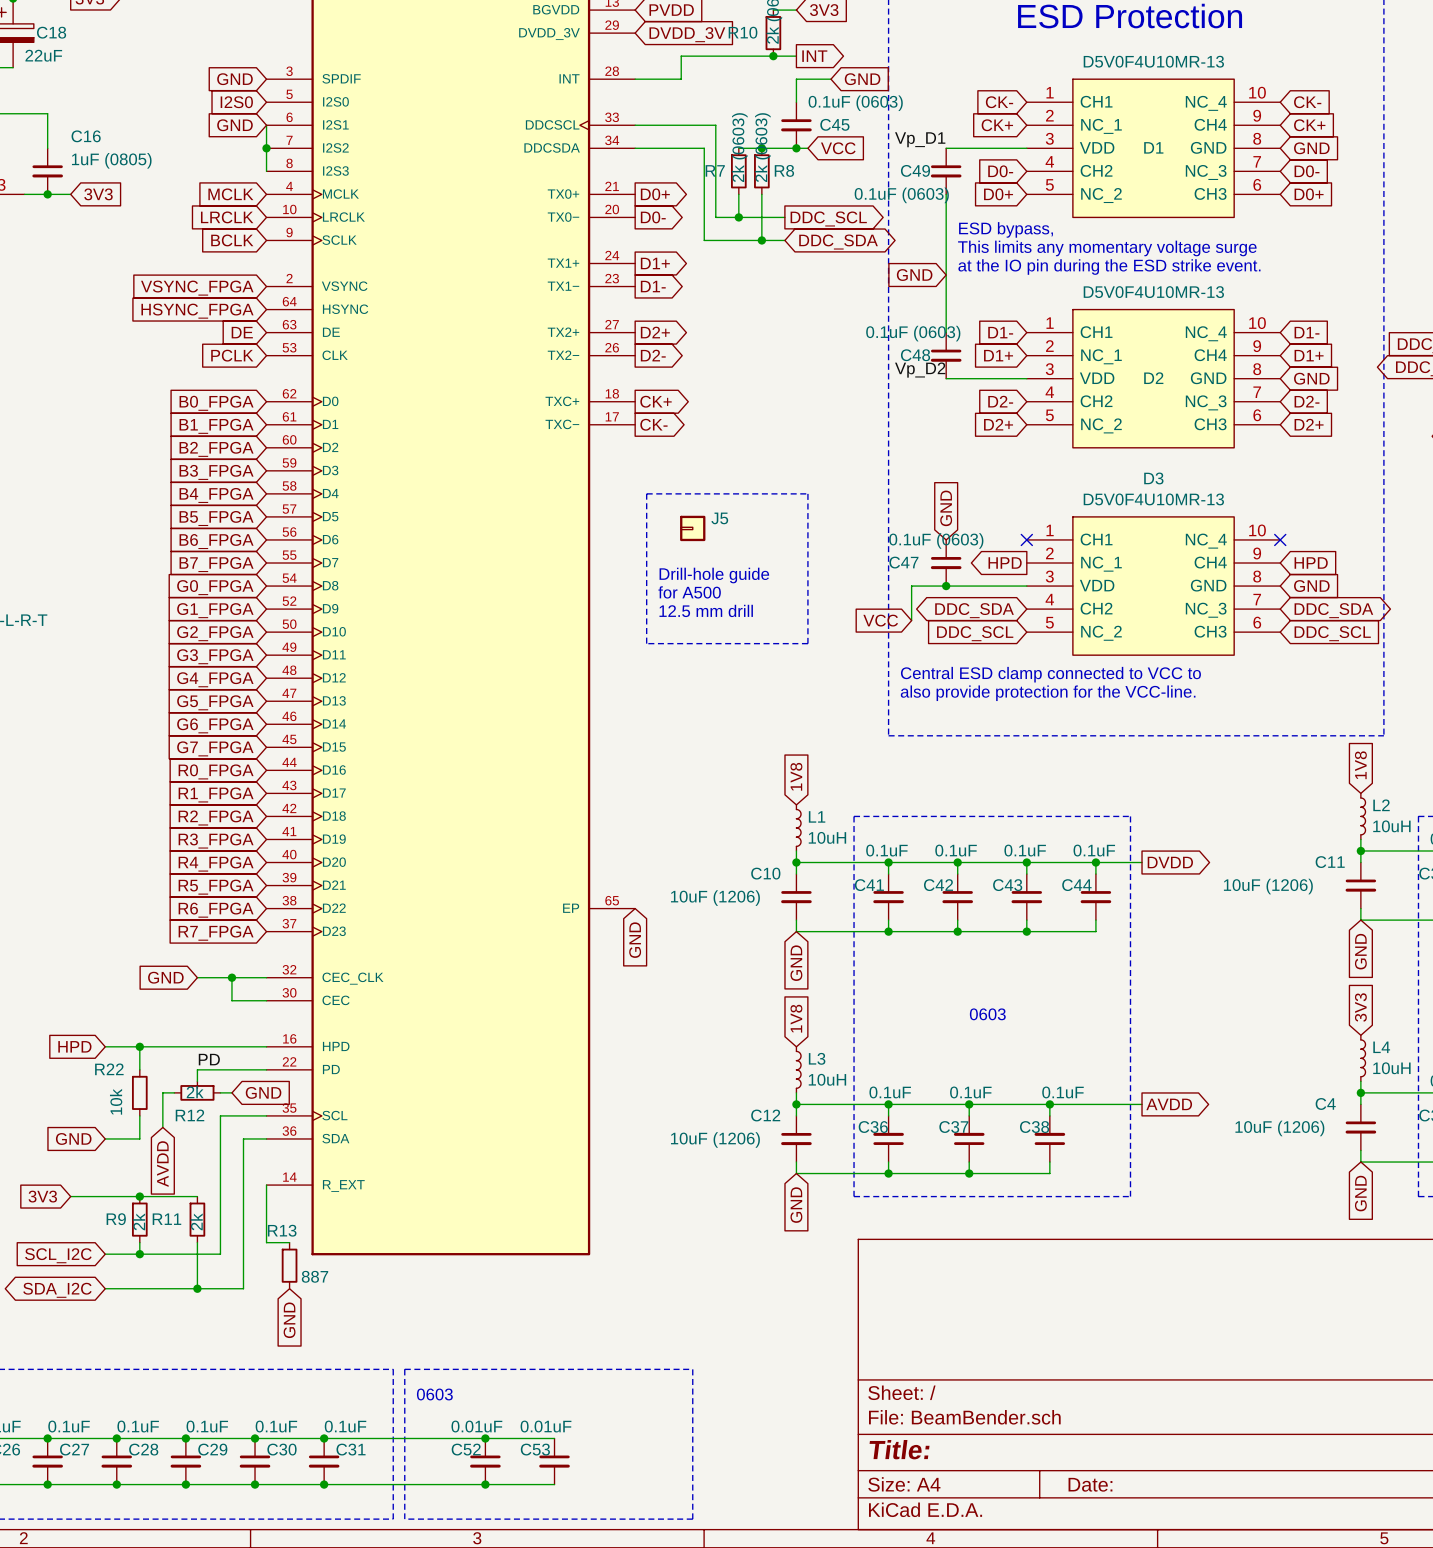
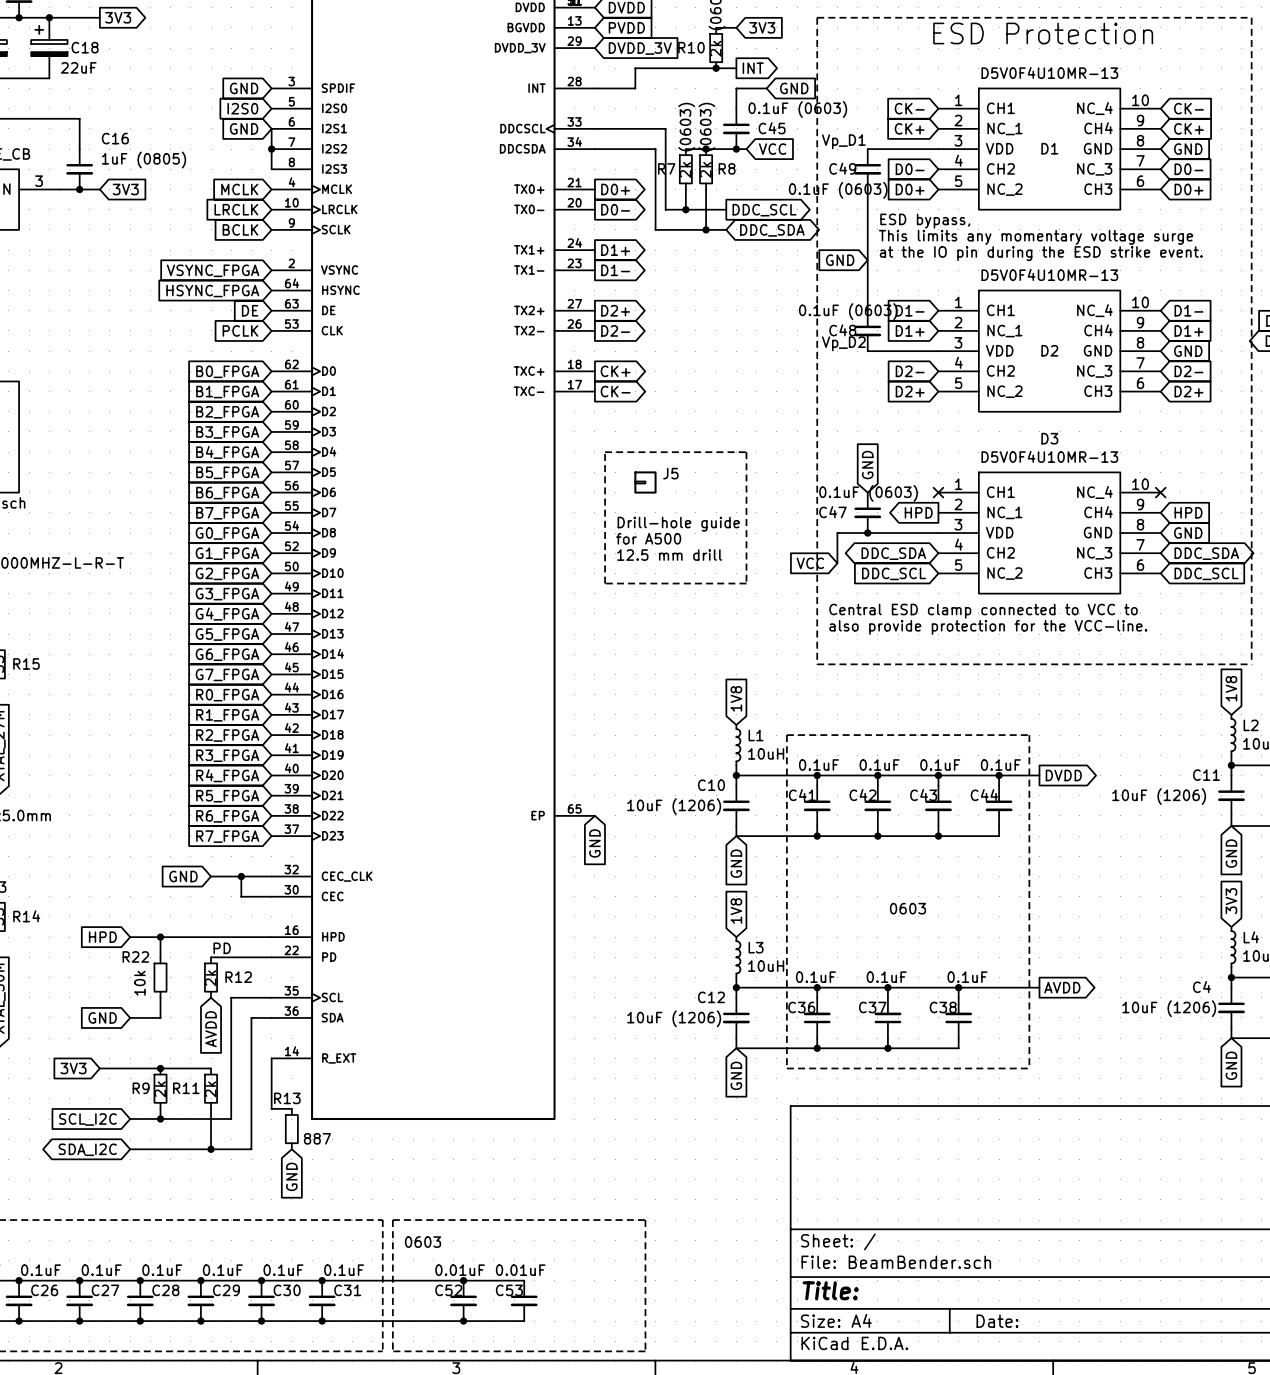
R12 symbol: [174, 1081, 221, 1101] -> [204, 957, 218, 998]
wire: (174, 1092) (162, 1092) (162, 1127) -> none
wire: (220, 1092) (231, 1092) -> none
global label: GND (263, 1092) -> none
R12 name position: R12 (190, 1115) -> R12 (238, 977)
global label position: AVDD (162, 1164) -> AVDD (211, 1029)

